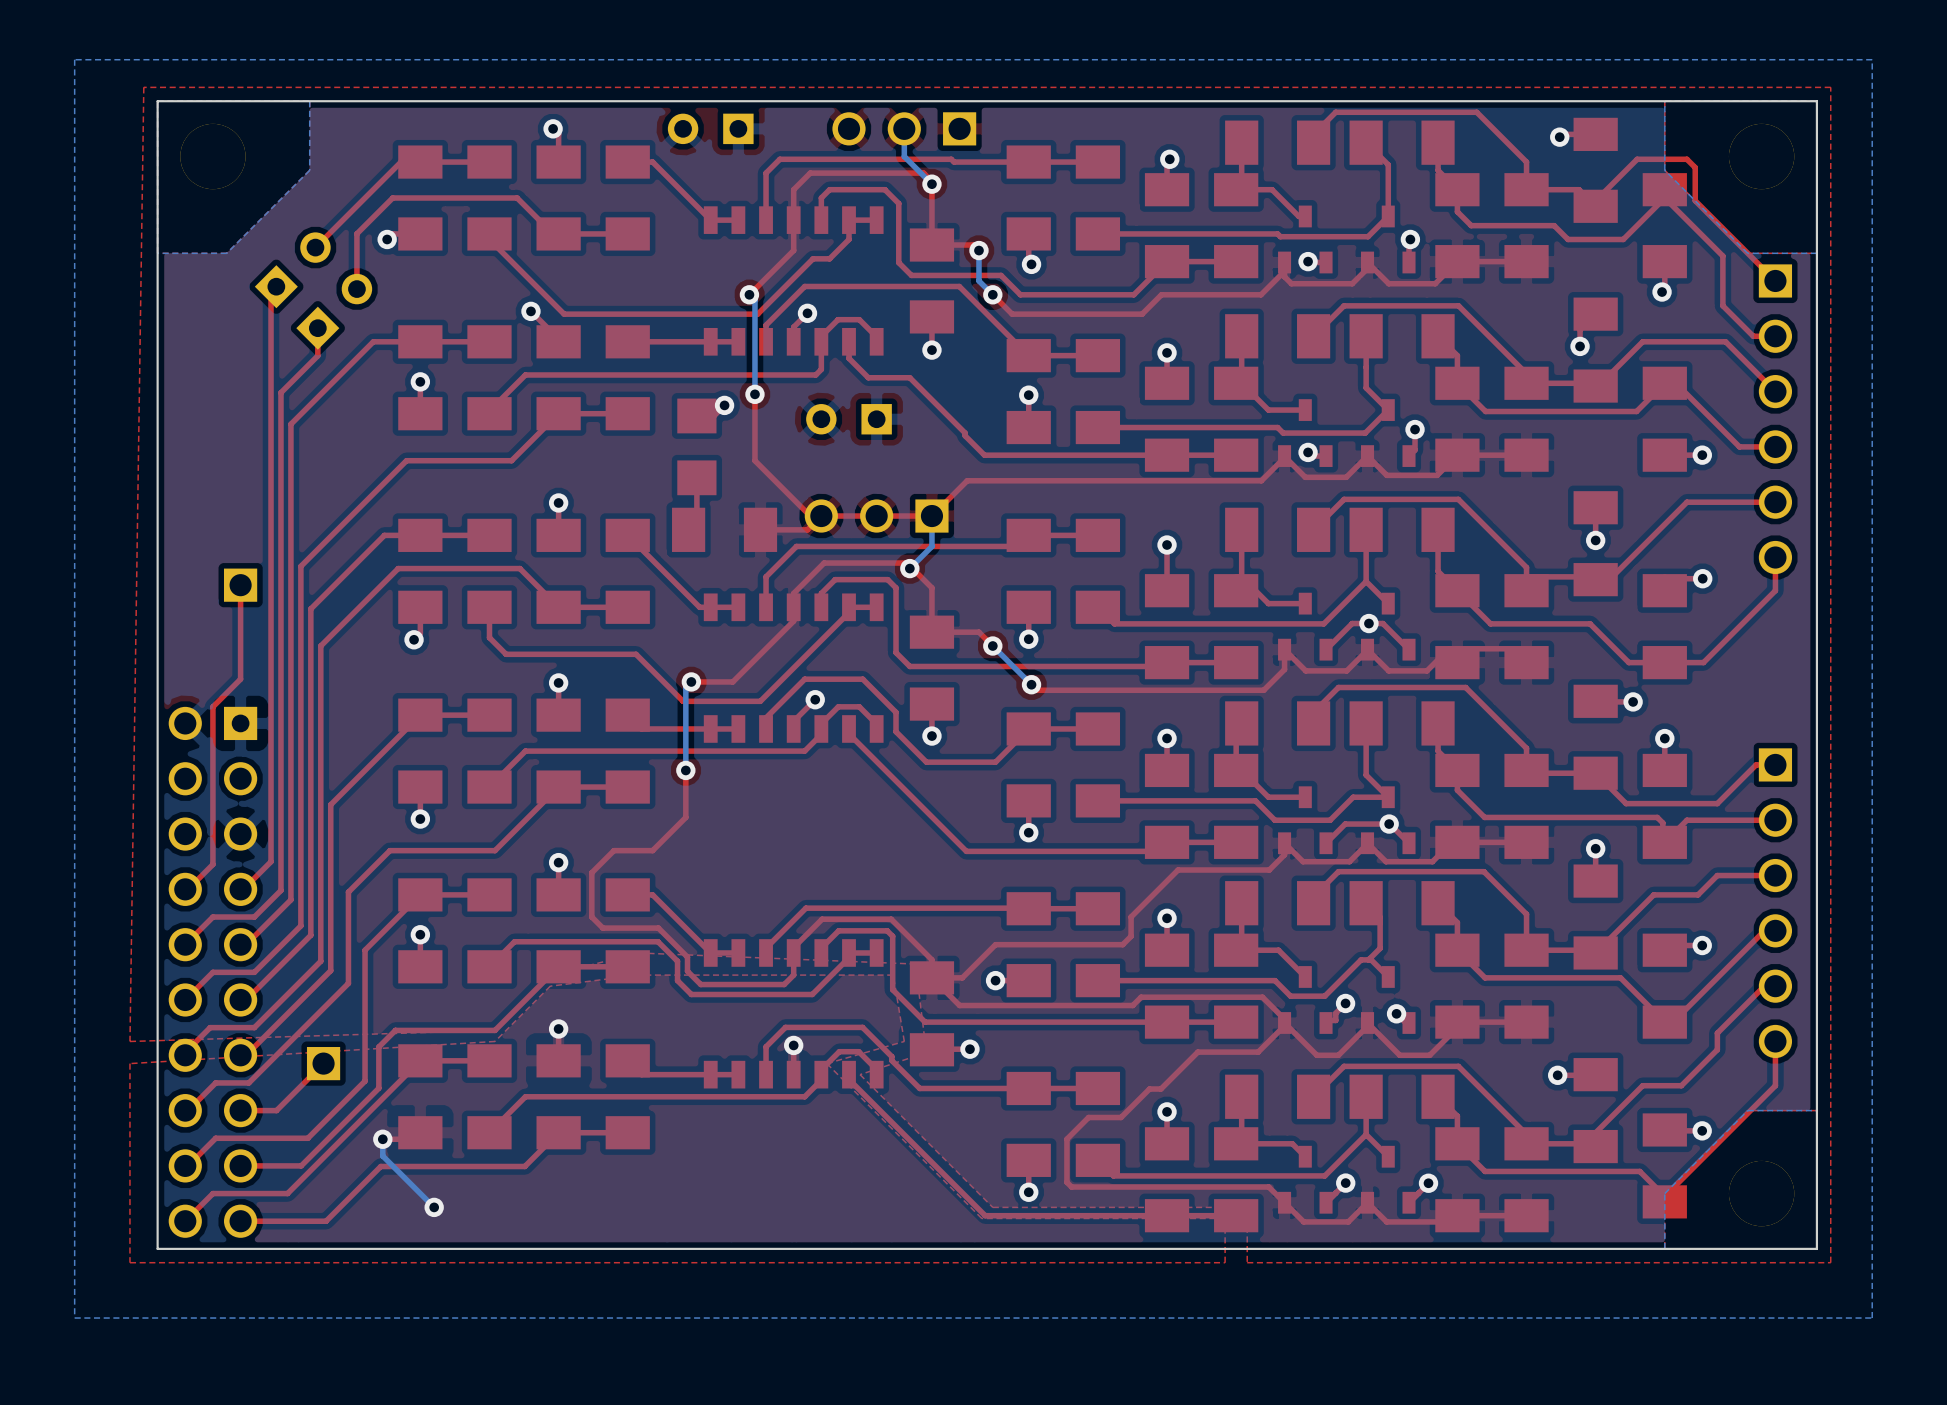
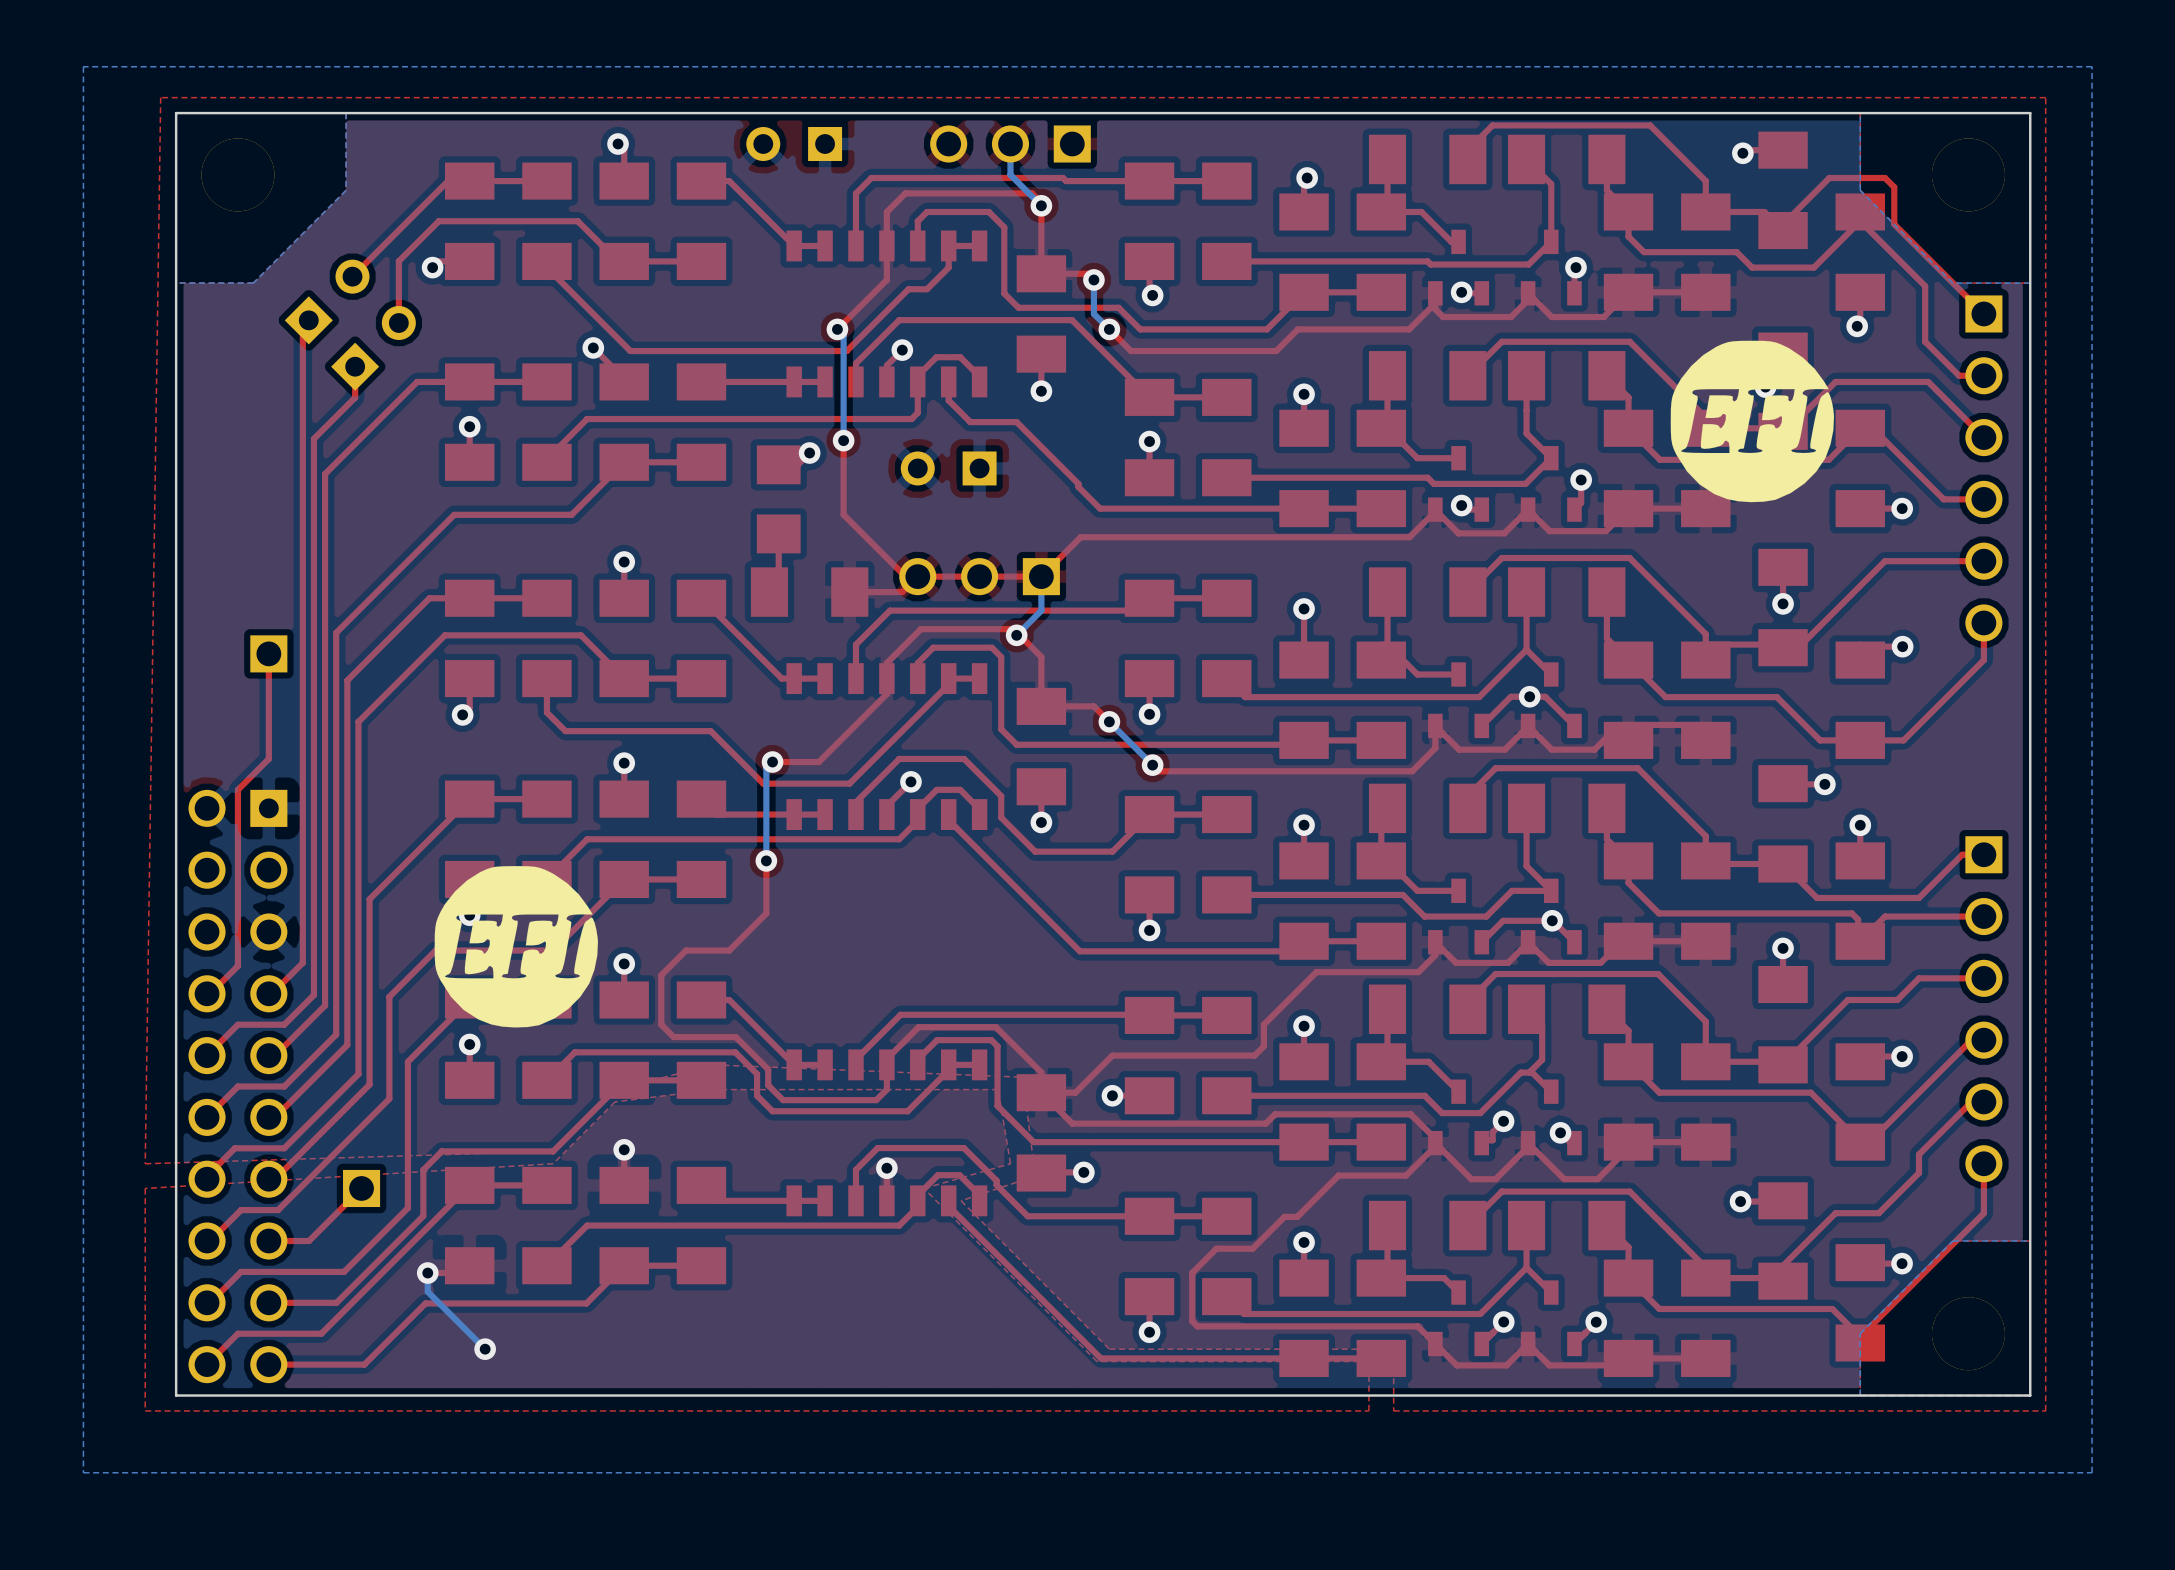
drawing: none -> [1670, 340, 1835, 503]
drawing: none -> [434, 866, 598, 1028]

